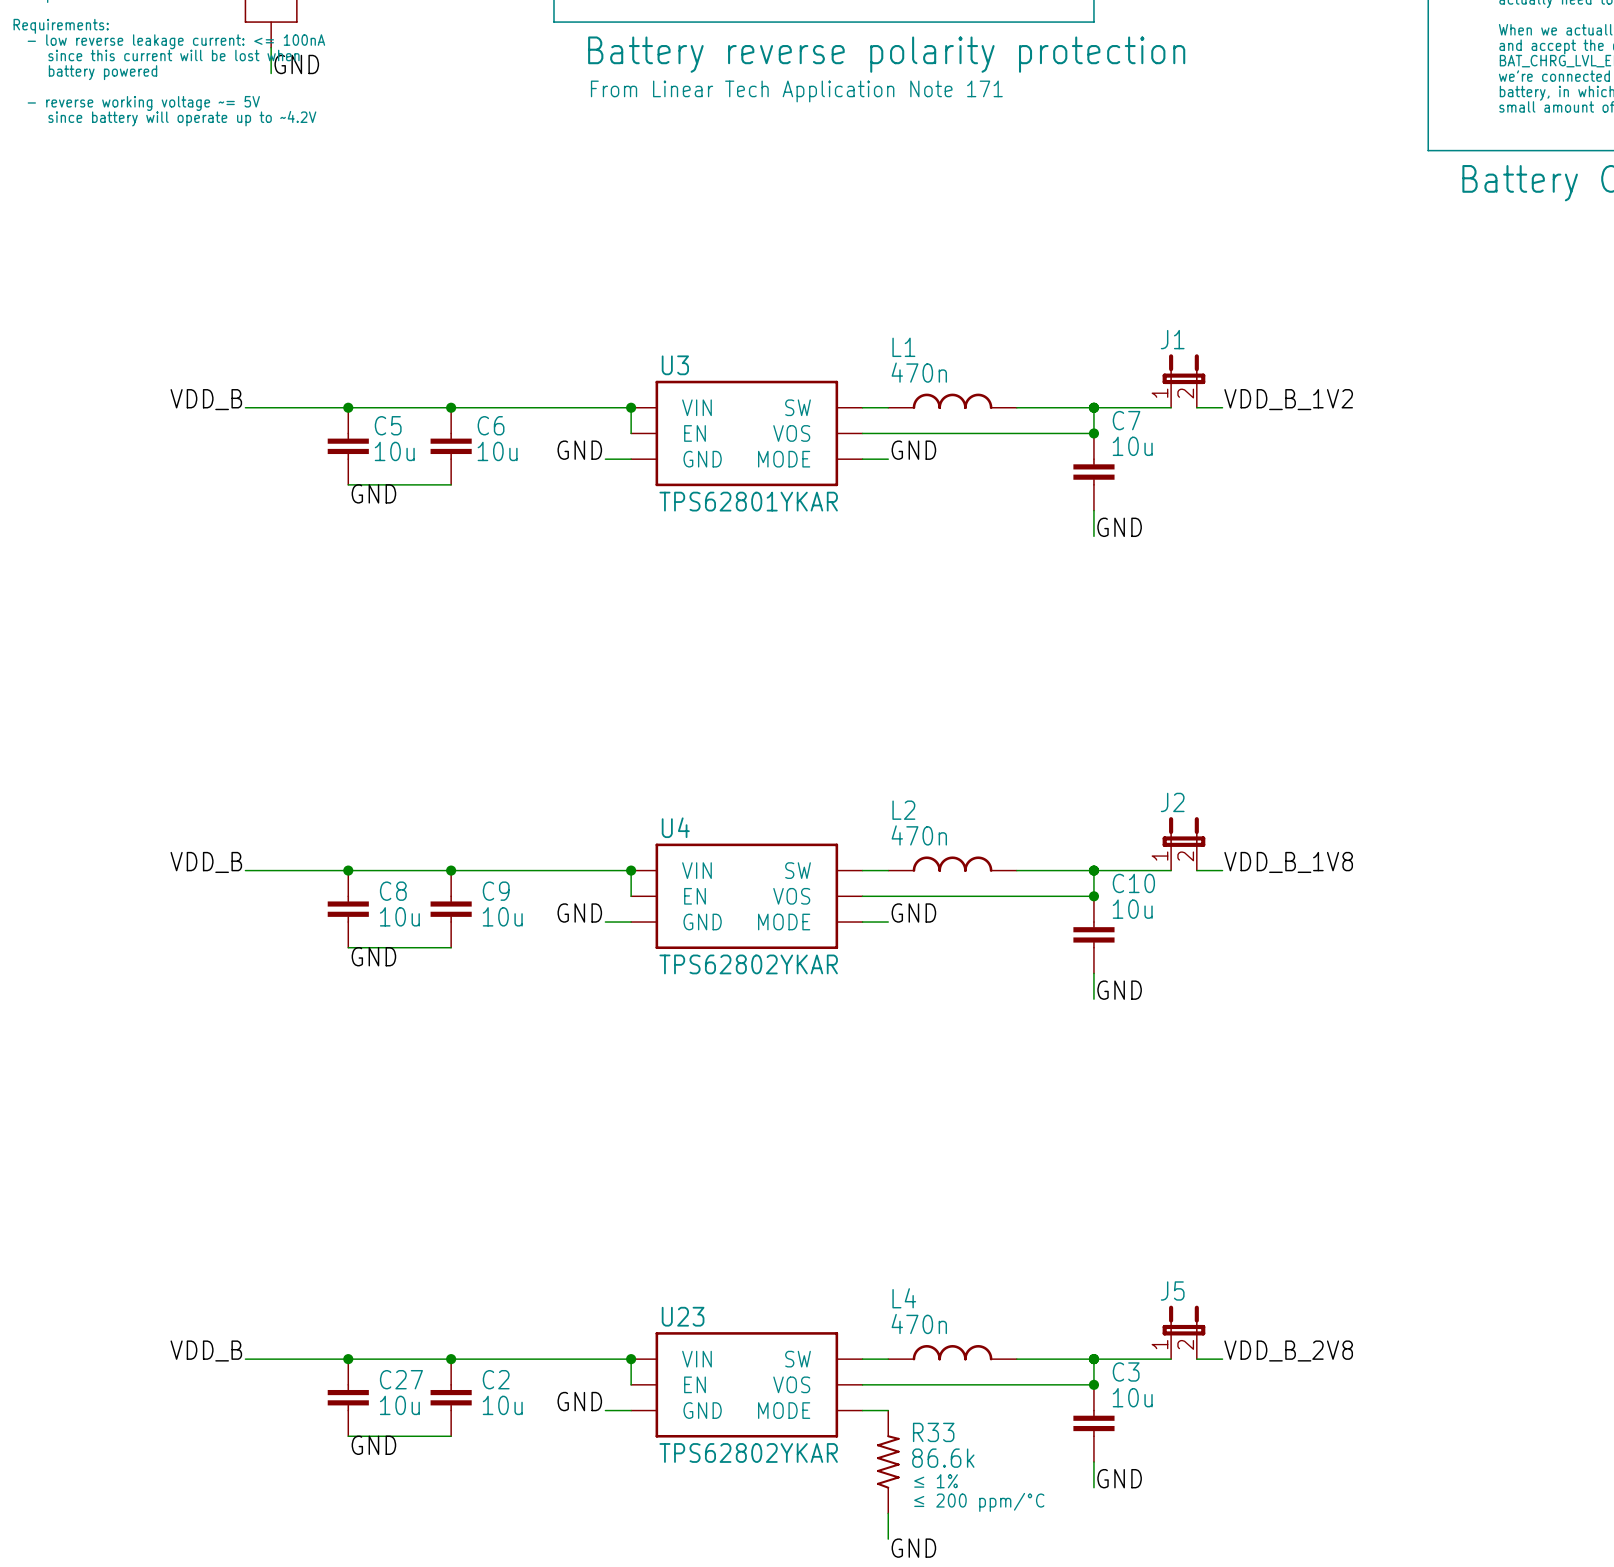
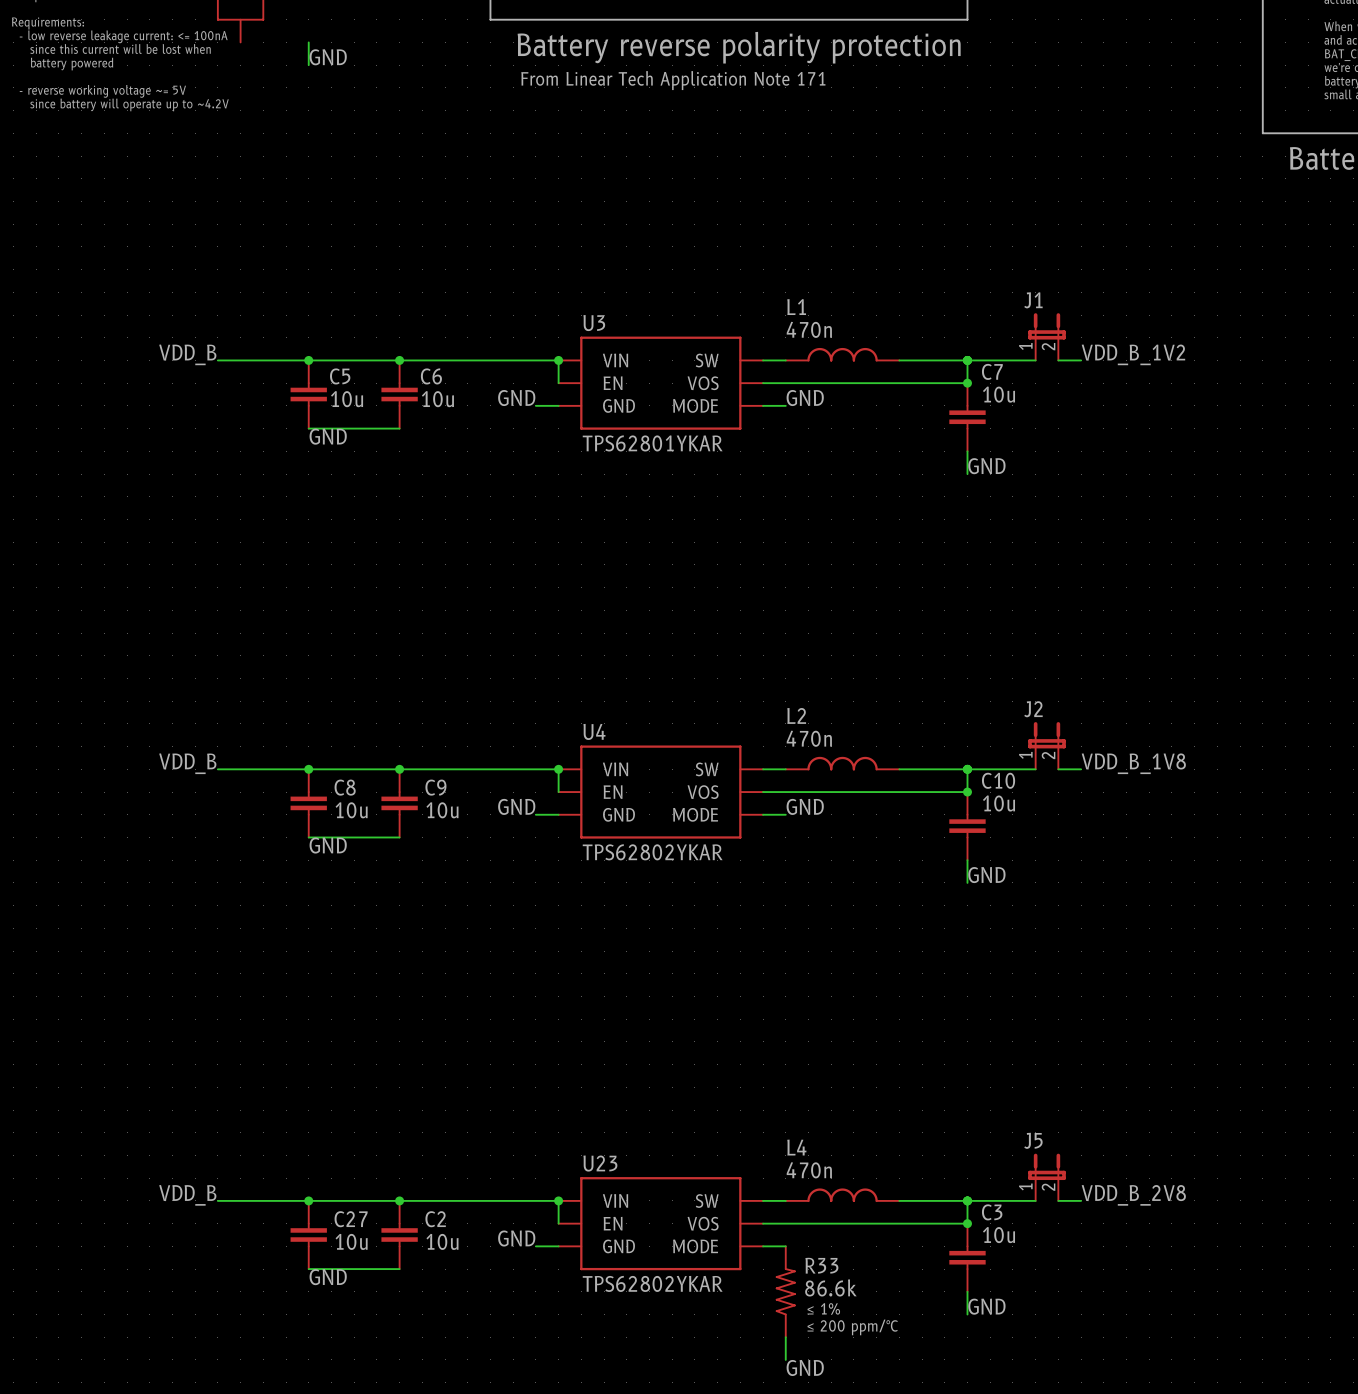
wire: (271, 47) (271, 73) -> (308, 42) (308, 65)
label position: GND (296, 64) -> GND (328, 57)

